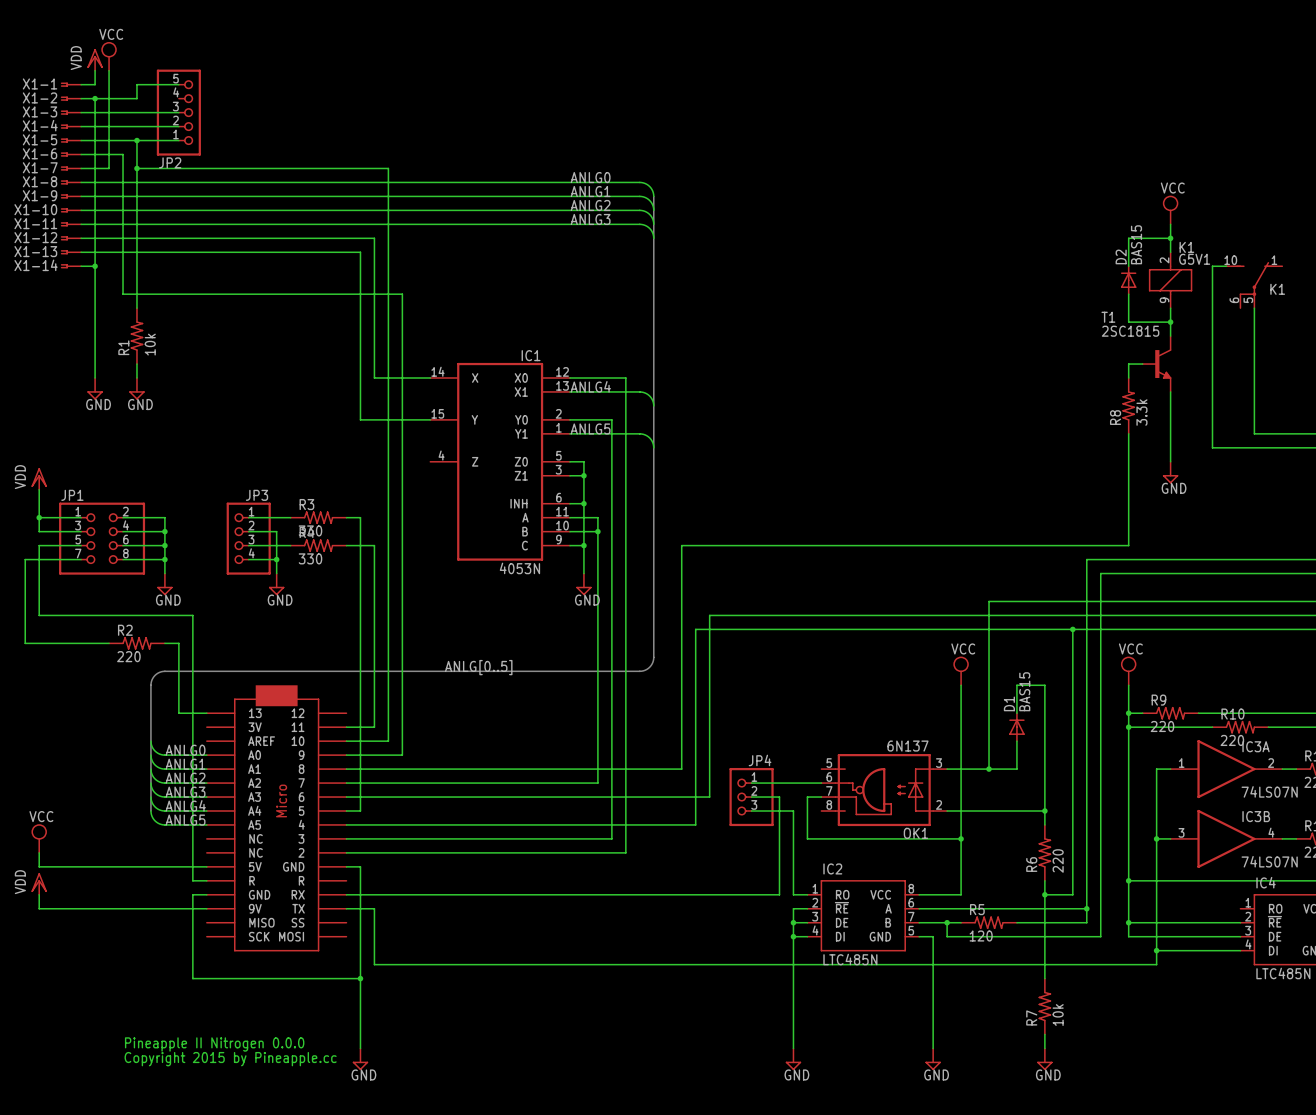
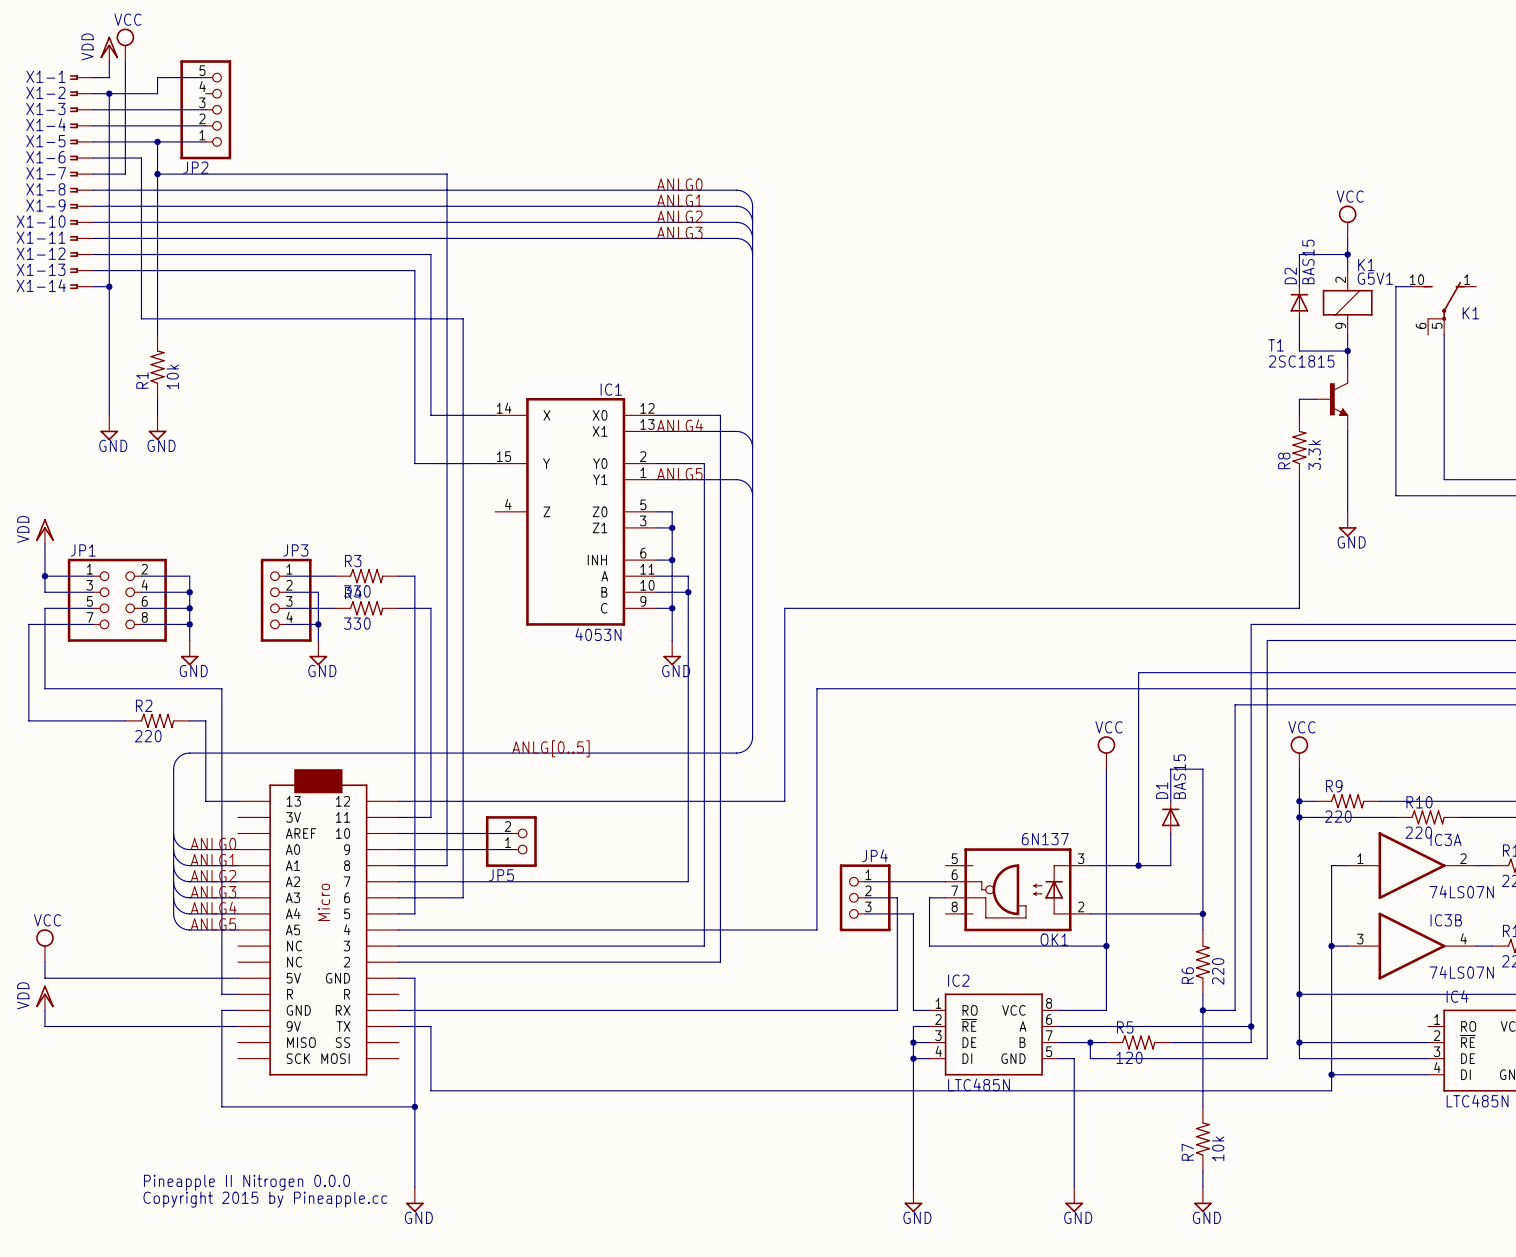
wire: (1072, 629) (695, 629) (695, 824) -> (816, 897) (816, 929) (800, 929)
junction: (1072, 629) -> none
wire: (681, 713) (681, 769) (388, 769) -> (784, 801) (398, 801)
wire: none -> (511, 833) (447, 833) (447, 865)
JP5: none -> (511, 841)
wire: (402, 797) (709, 797) -> (463, 897) (463, 849) (511, 849)

